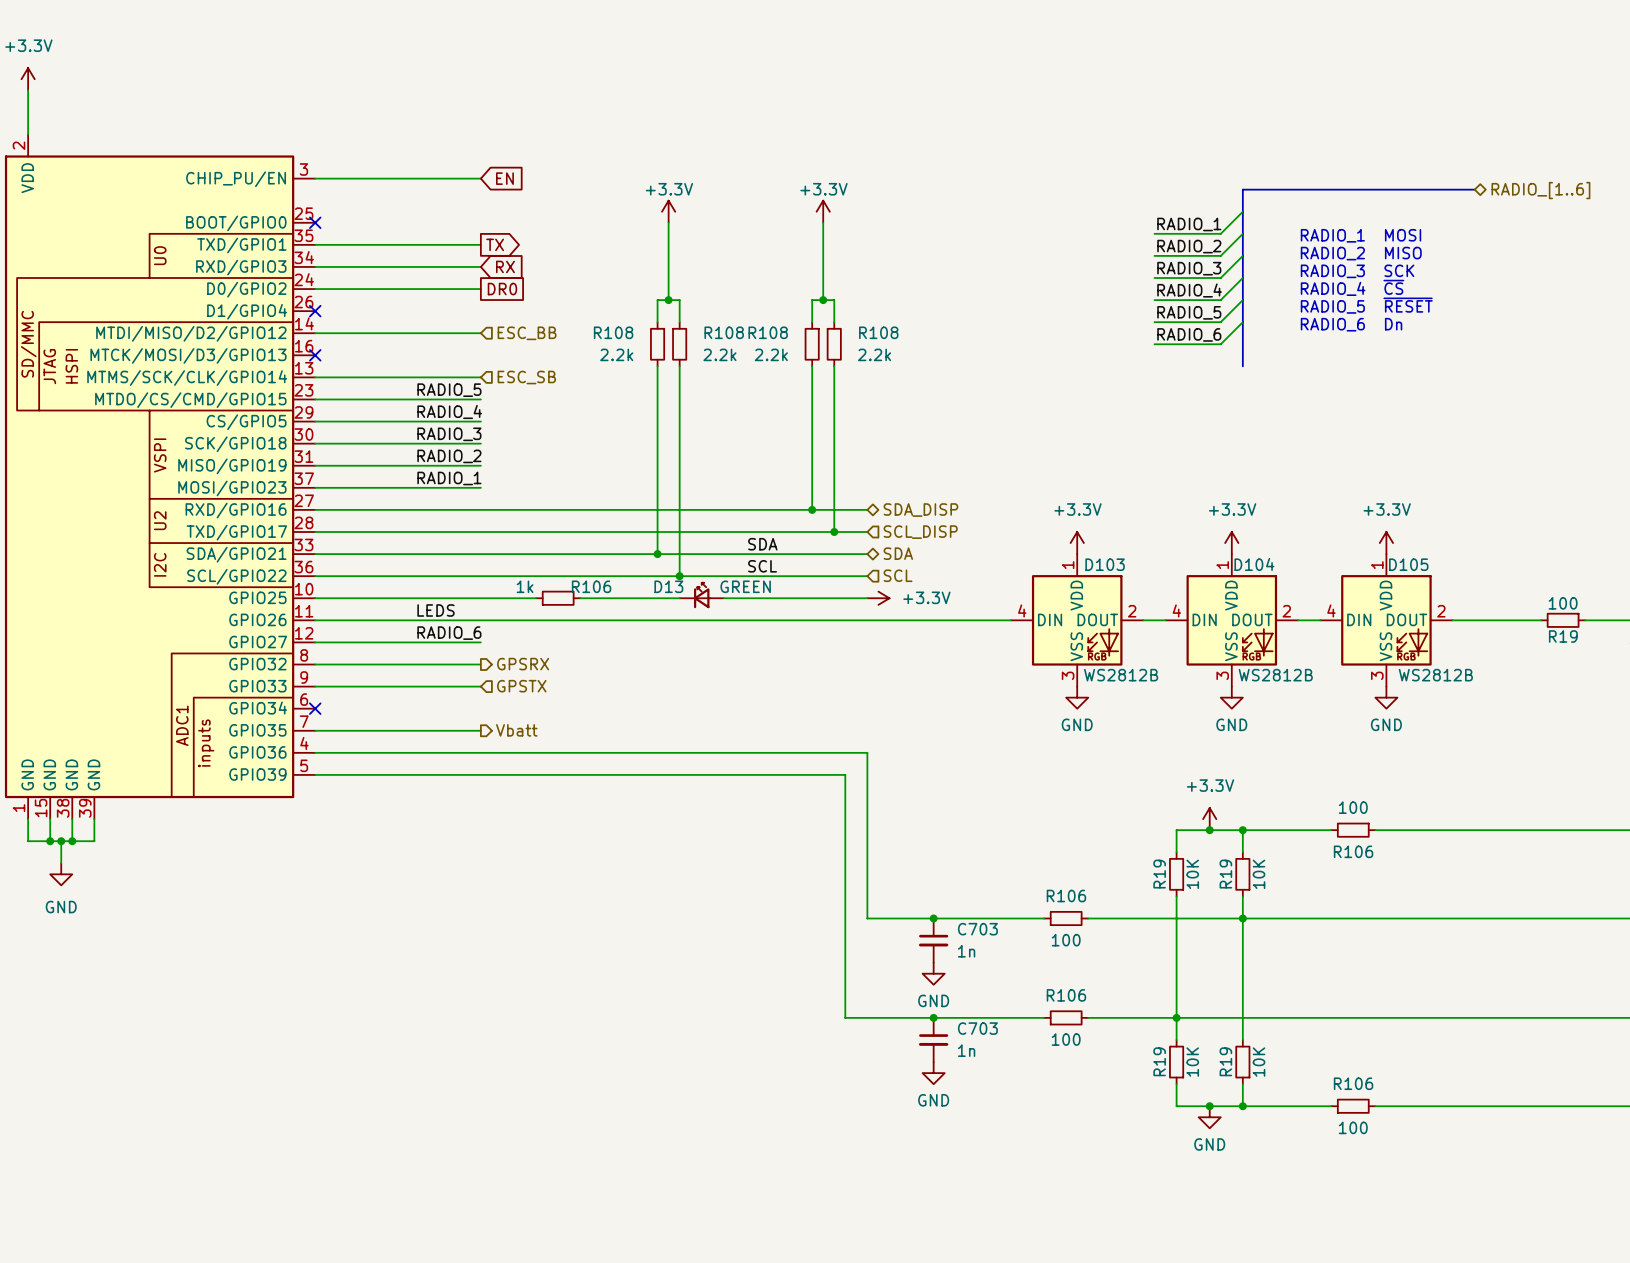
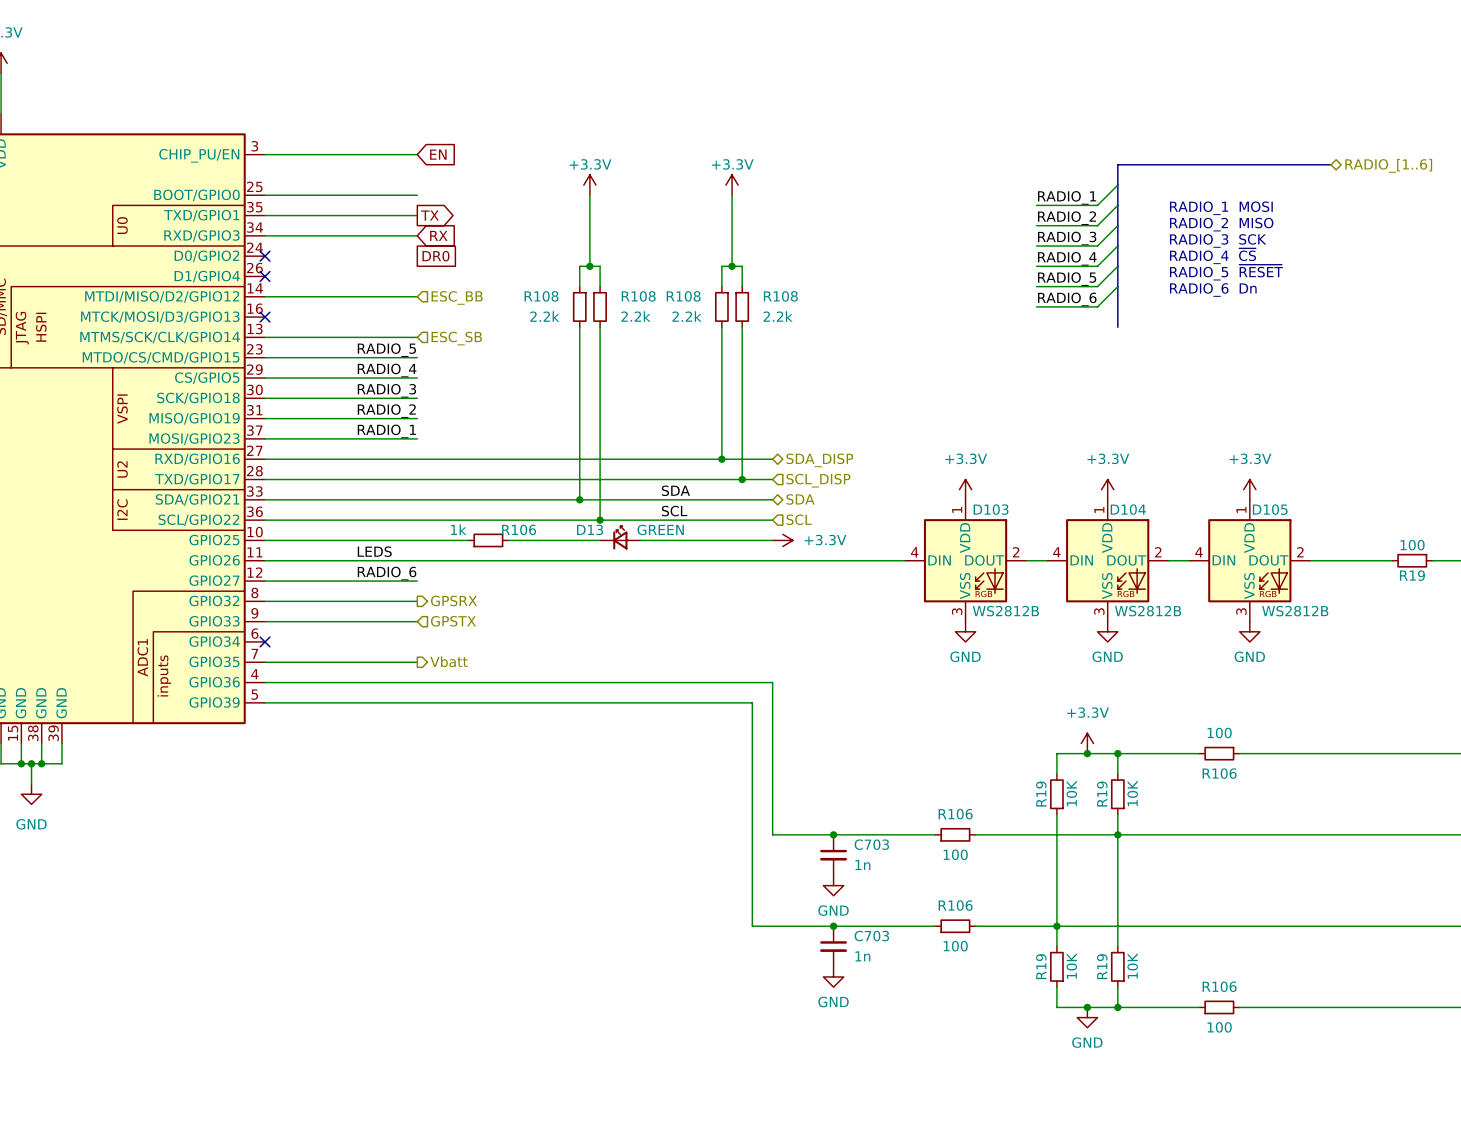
no-connect mark: (315, 222) -> none
wire: (315, 289) (480, 289) -> (265, 195) (417, 195)
no-connect mark: none -> (265, 256)

